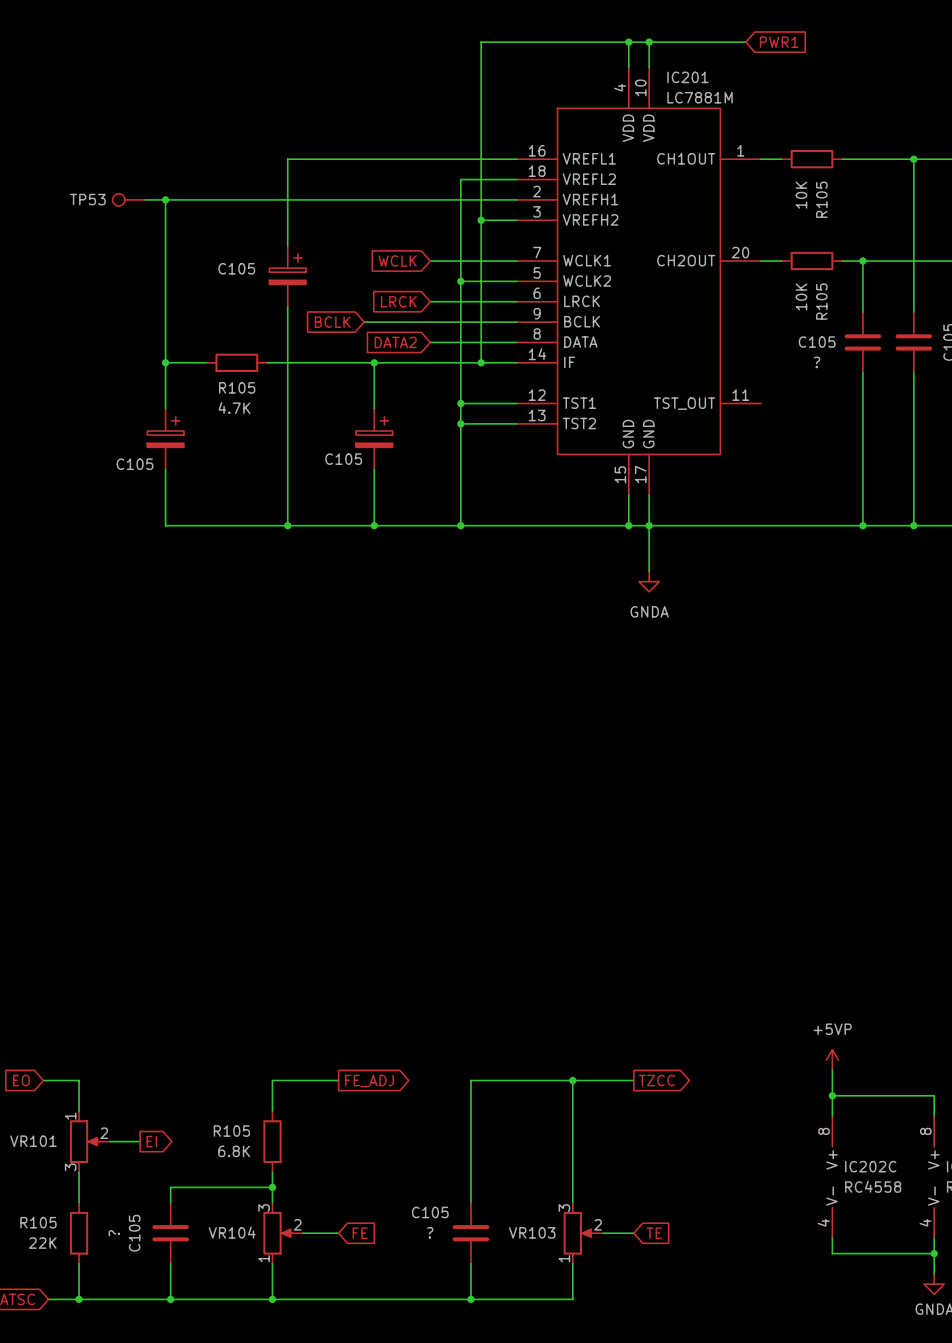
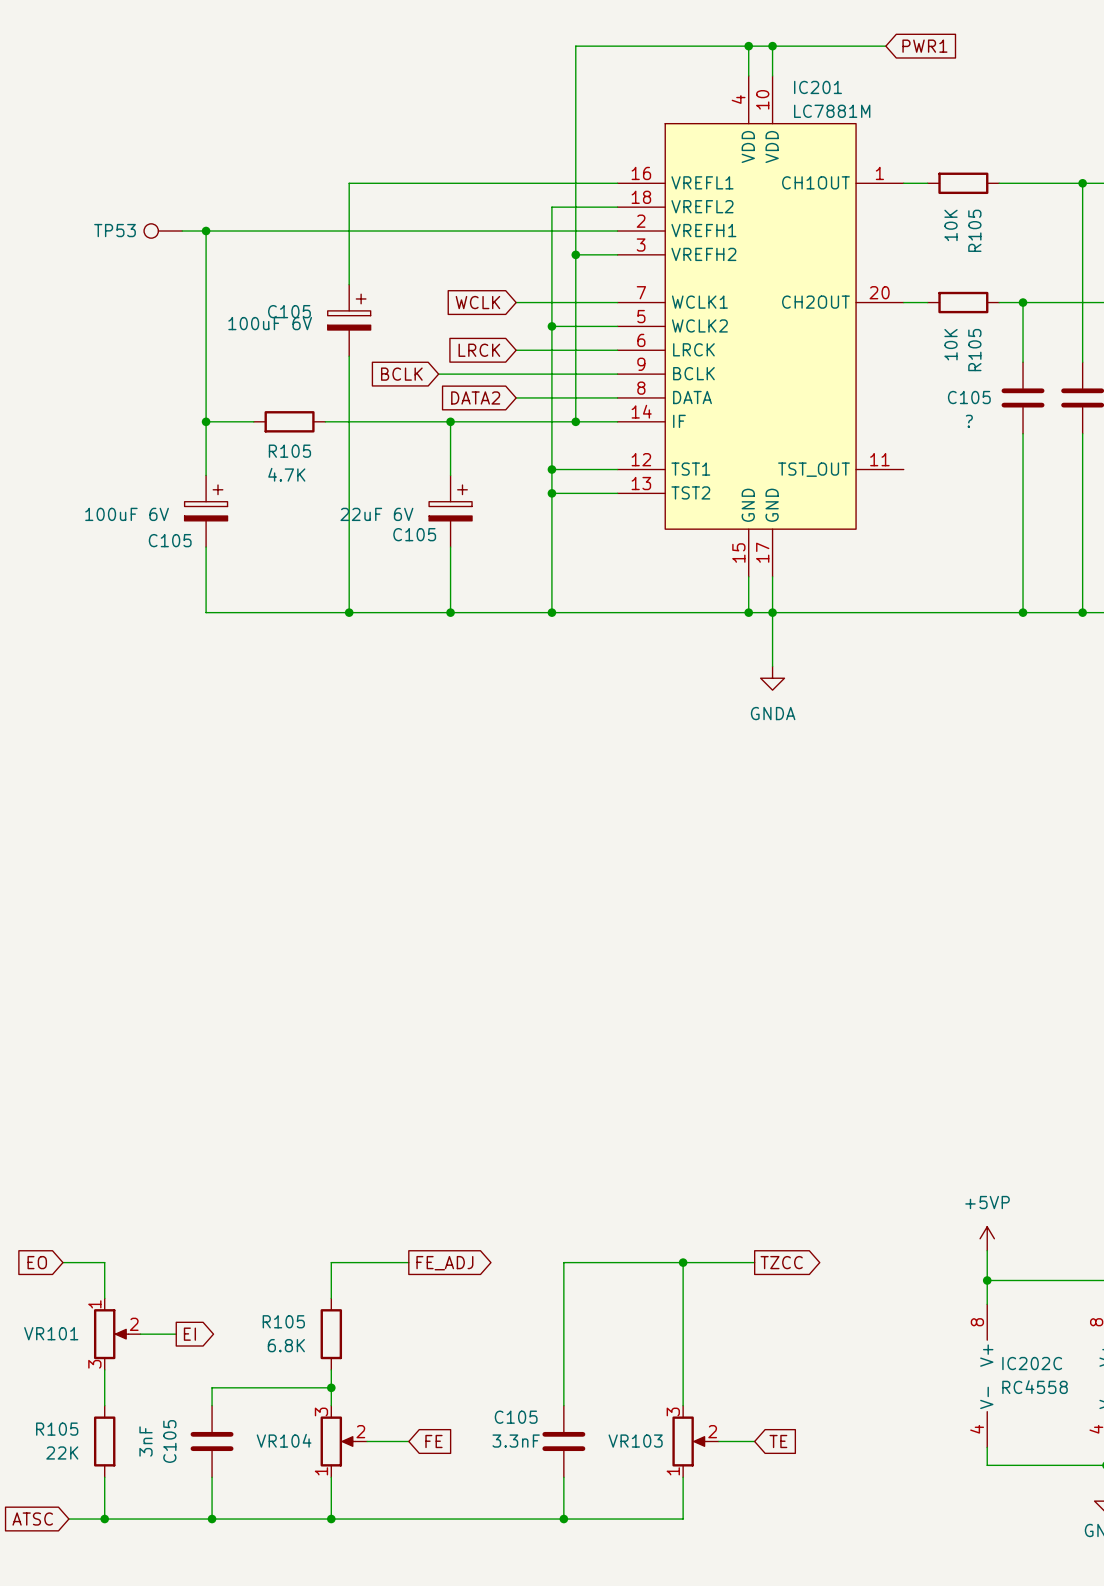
C105 value: none -> 100uF 6V (270, 323)
C105 value: none -> 100uF 6V (127, 514)
C105 value: none -> 22uF 6V (376, 514)
C105 value: ? (430, 1232) -> 3.3nF (516, 1441)
C105 value: ? (114, 1233) -> 3nF (146, 1441)

